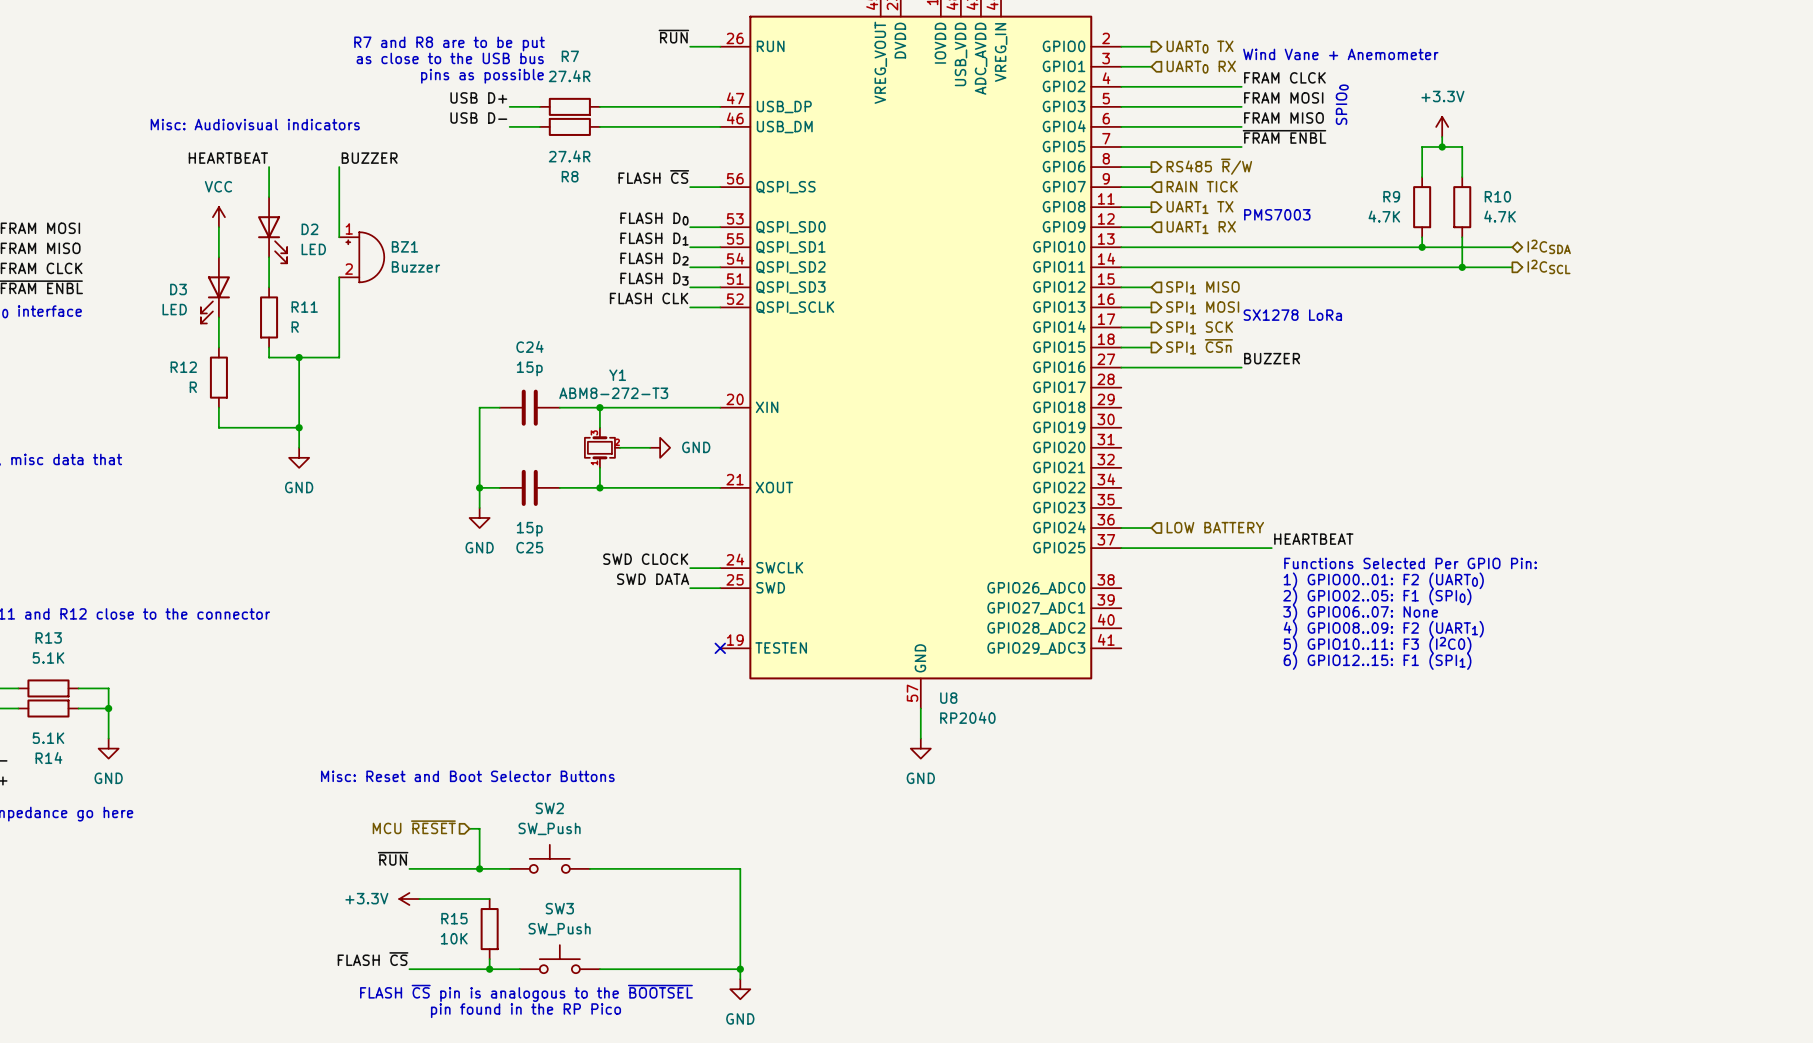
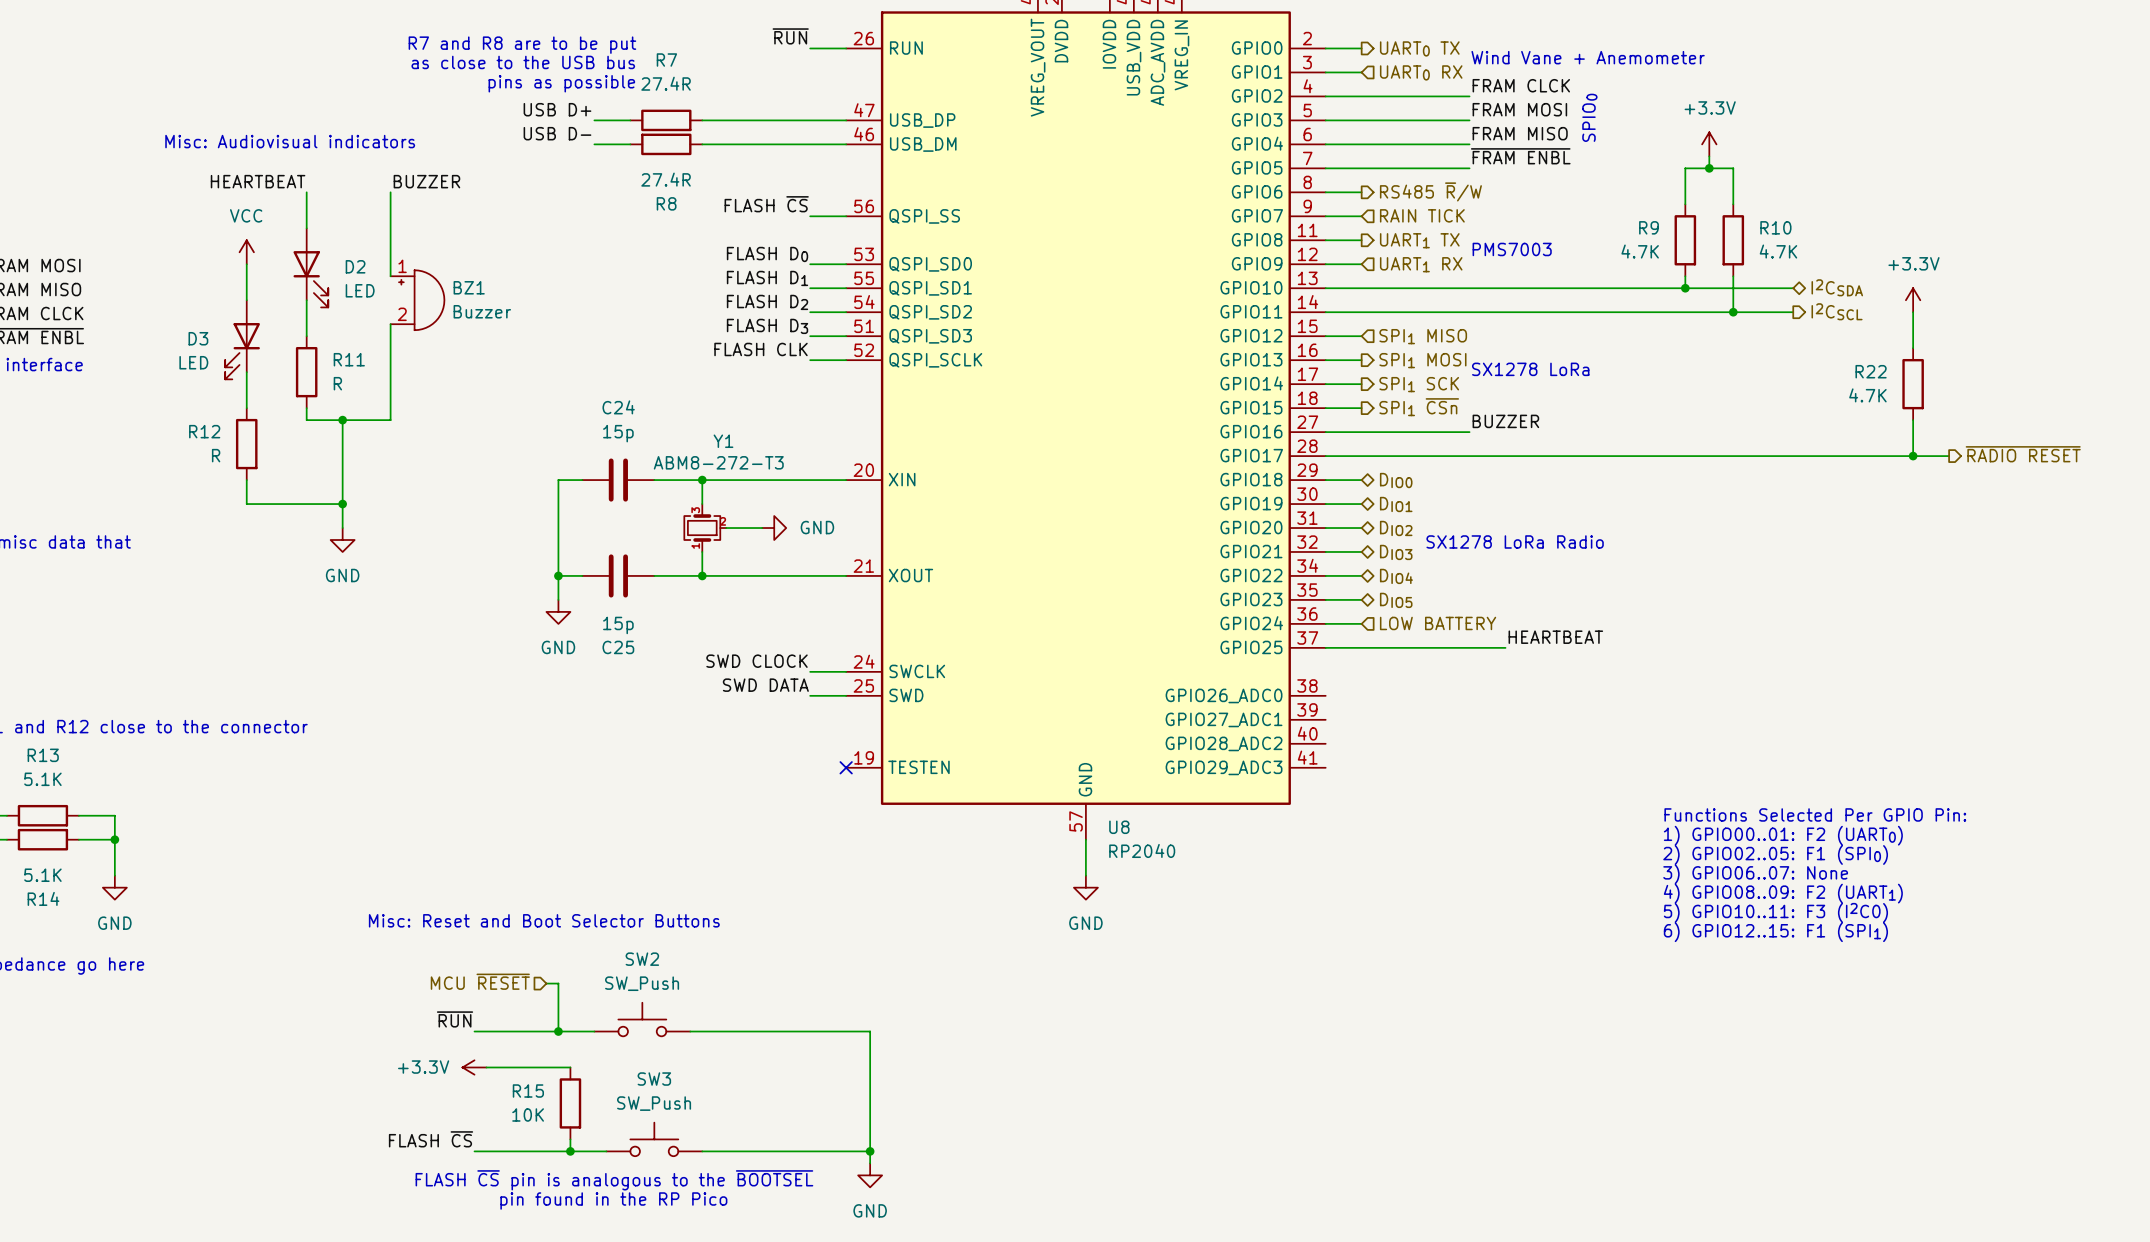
power symbol: none -> +3.3V (1913, 300)
wire: none -> (1913, 312) (1913, 348)
R22: none -> 4.7K (1913, 384)
wire: none -> (1913, 420) (1913, 456)
hierarchical label: none -> ~{RADIO RESET} (2023, 454)
wire: none -> (1325, 456) (1949, 456)
junction: none -> (1913, 456)
wire: none -> (1325, 480) (1361, 480)
hierarchical label: none -> DIO0 (1396, 480)
wire: none -> (1325, 504) (1361, 504)
hierarchical label: none -> DIO1 (1396, 504)
wire: none -> (1325, 528) (1361, 528)
hierarchical label: none -> DIO2 (1396, 528)
text: none -> SX1278 LoRa Radio (1515, 541)
wire: none -> (1325, 551) (1361, 551)
hierarchical label: none -> DIO3 (1396, 552)
wire: none -> (1325, 575) (1361, 575)
hierarchical label: none -> DIO4 (1396, 576)
wire: none -> (1325, 599) (1361, 599)
hierarchical label: none -> DIO5 (1396, 600)
text position: Functions Selected Per GPIO Pin: (1410, 563) -> Functions Selected Per GPIO Pin: (1815, 814)
text position: 1) GPIO00..01: F2 (UART0) (1383, 580) -> 1) GPIO00..01: F2 (UART0) (1783, 835)
text position: 2) GPIO02..05: F1 (SPI0) (1377, 596) -> 2) GPIO02..05: F1 (SPI0) (1775, 854)
text position: 3) GPIO06..07: None (1360, 613) -> 3) GPIO06..07: None (1755, 874)
text position: 4) GPIO08..09: F2 (UART1) (1383, 629) -> 4) GPIO08..09: F2 (UART1) (1783, 893)
text position: 5) GPIO10..11: F3 (I2C0) (1377, 645) -> 5) GPIO10..11: F3 (I2C0) (1775, 912)
text position: 6) GPIO12..15: F1 (SPI1) (1377, 661) -> 6) GPIO12..15: F1 (SPI1) (1775, 932)

